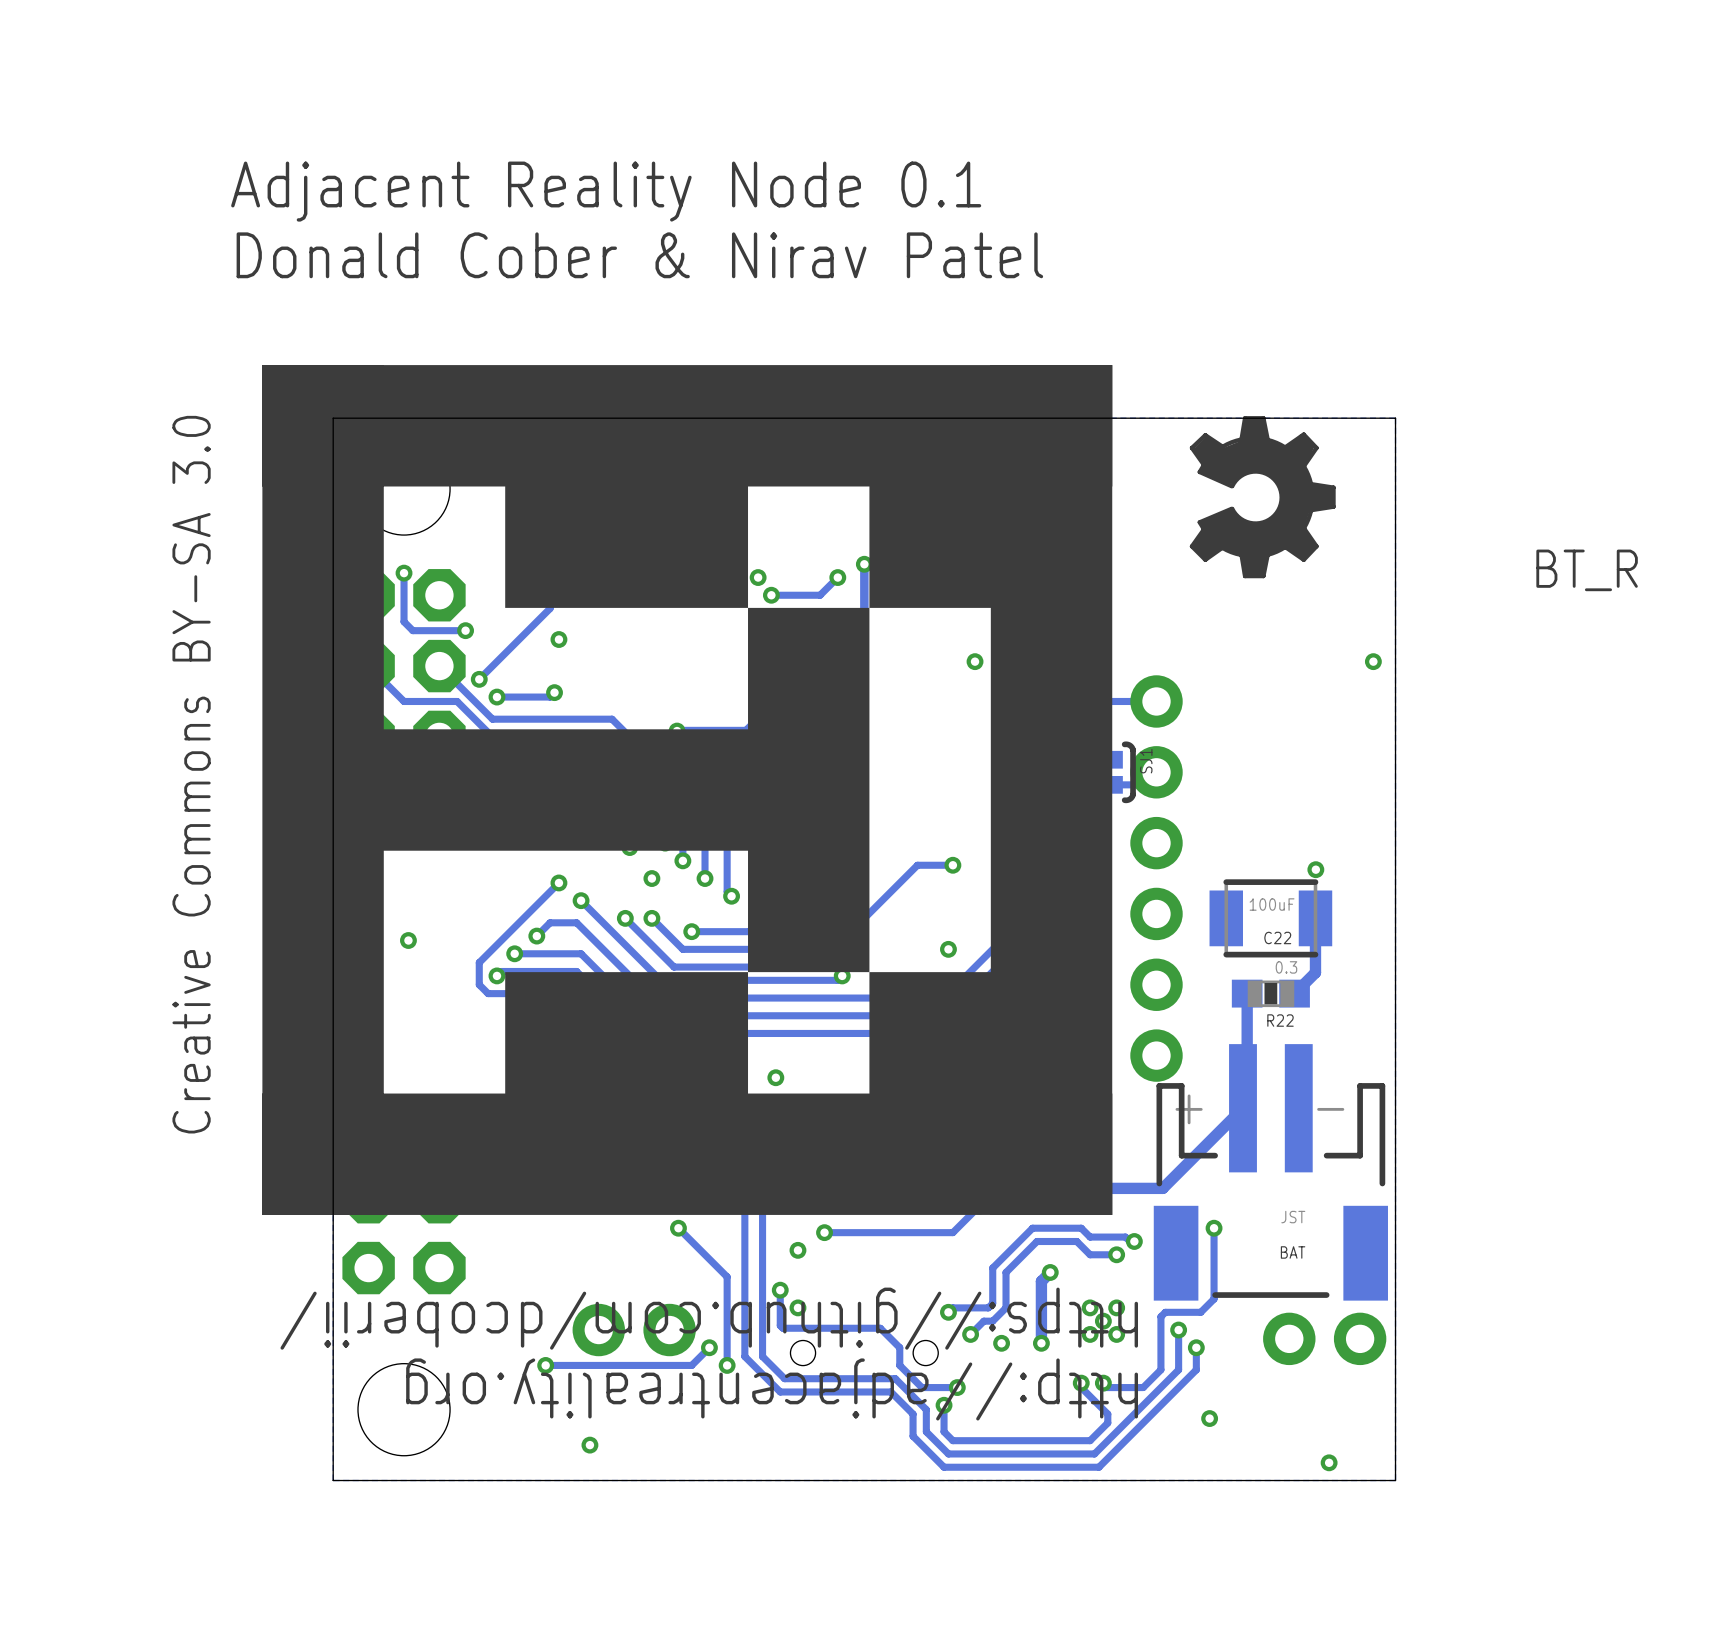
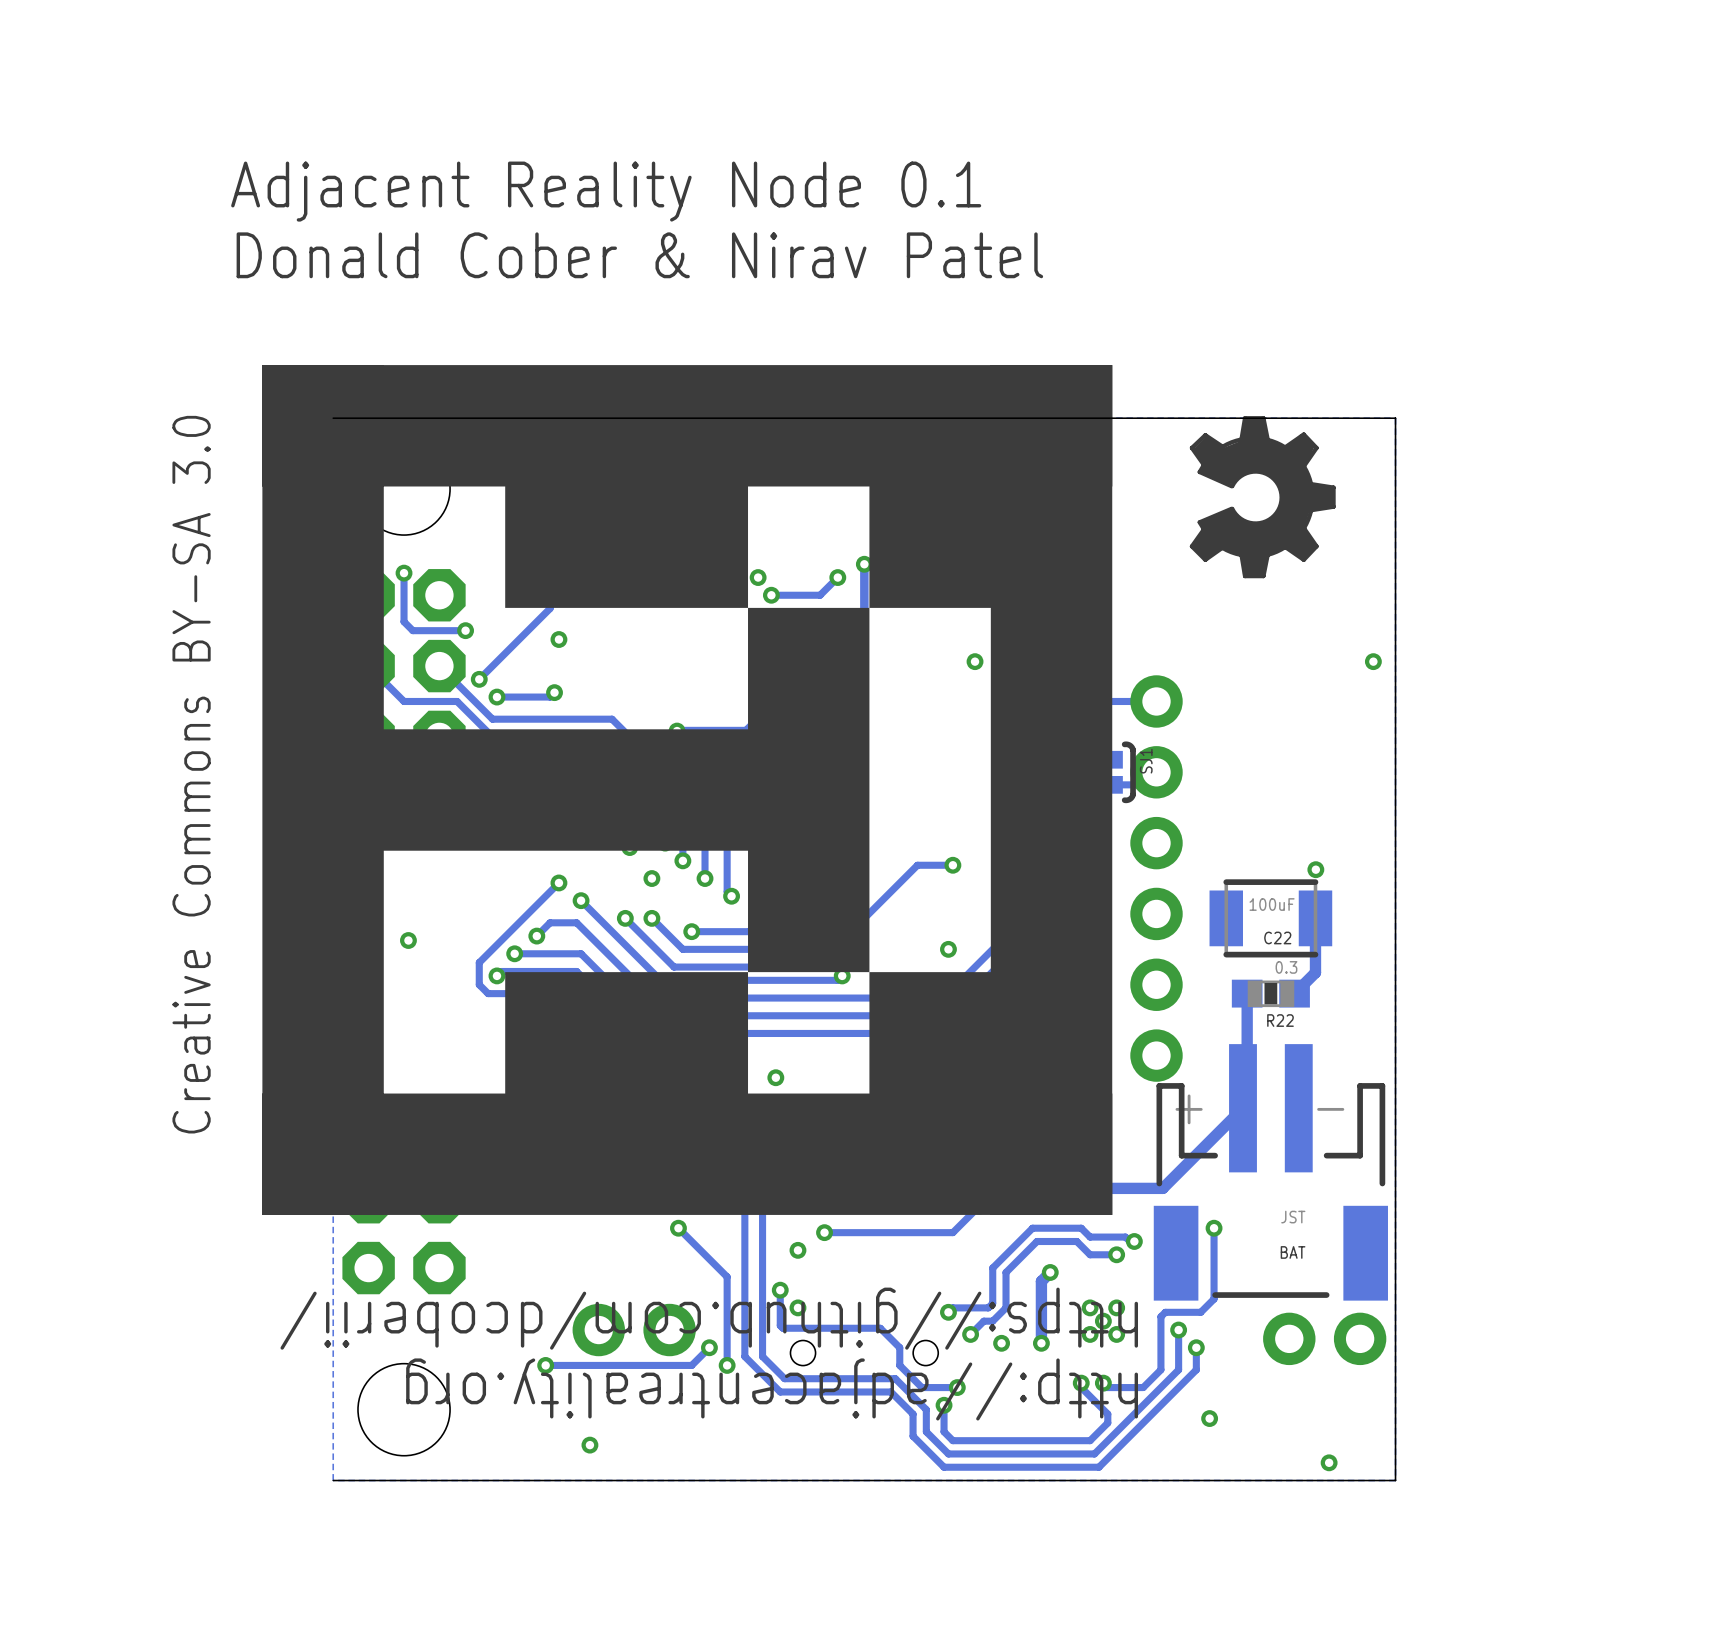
board edge: (333, 418) (333, 1480) -> none
text: BT_R (1587, 570) -> none

